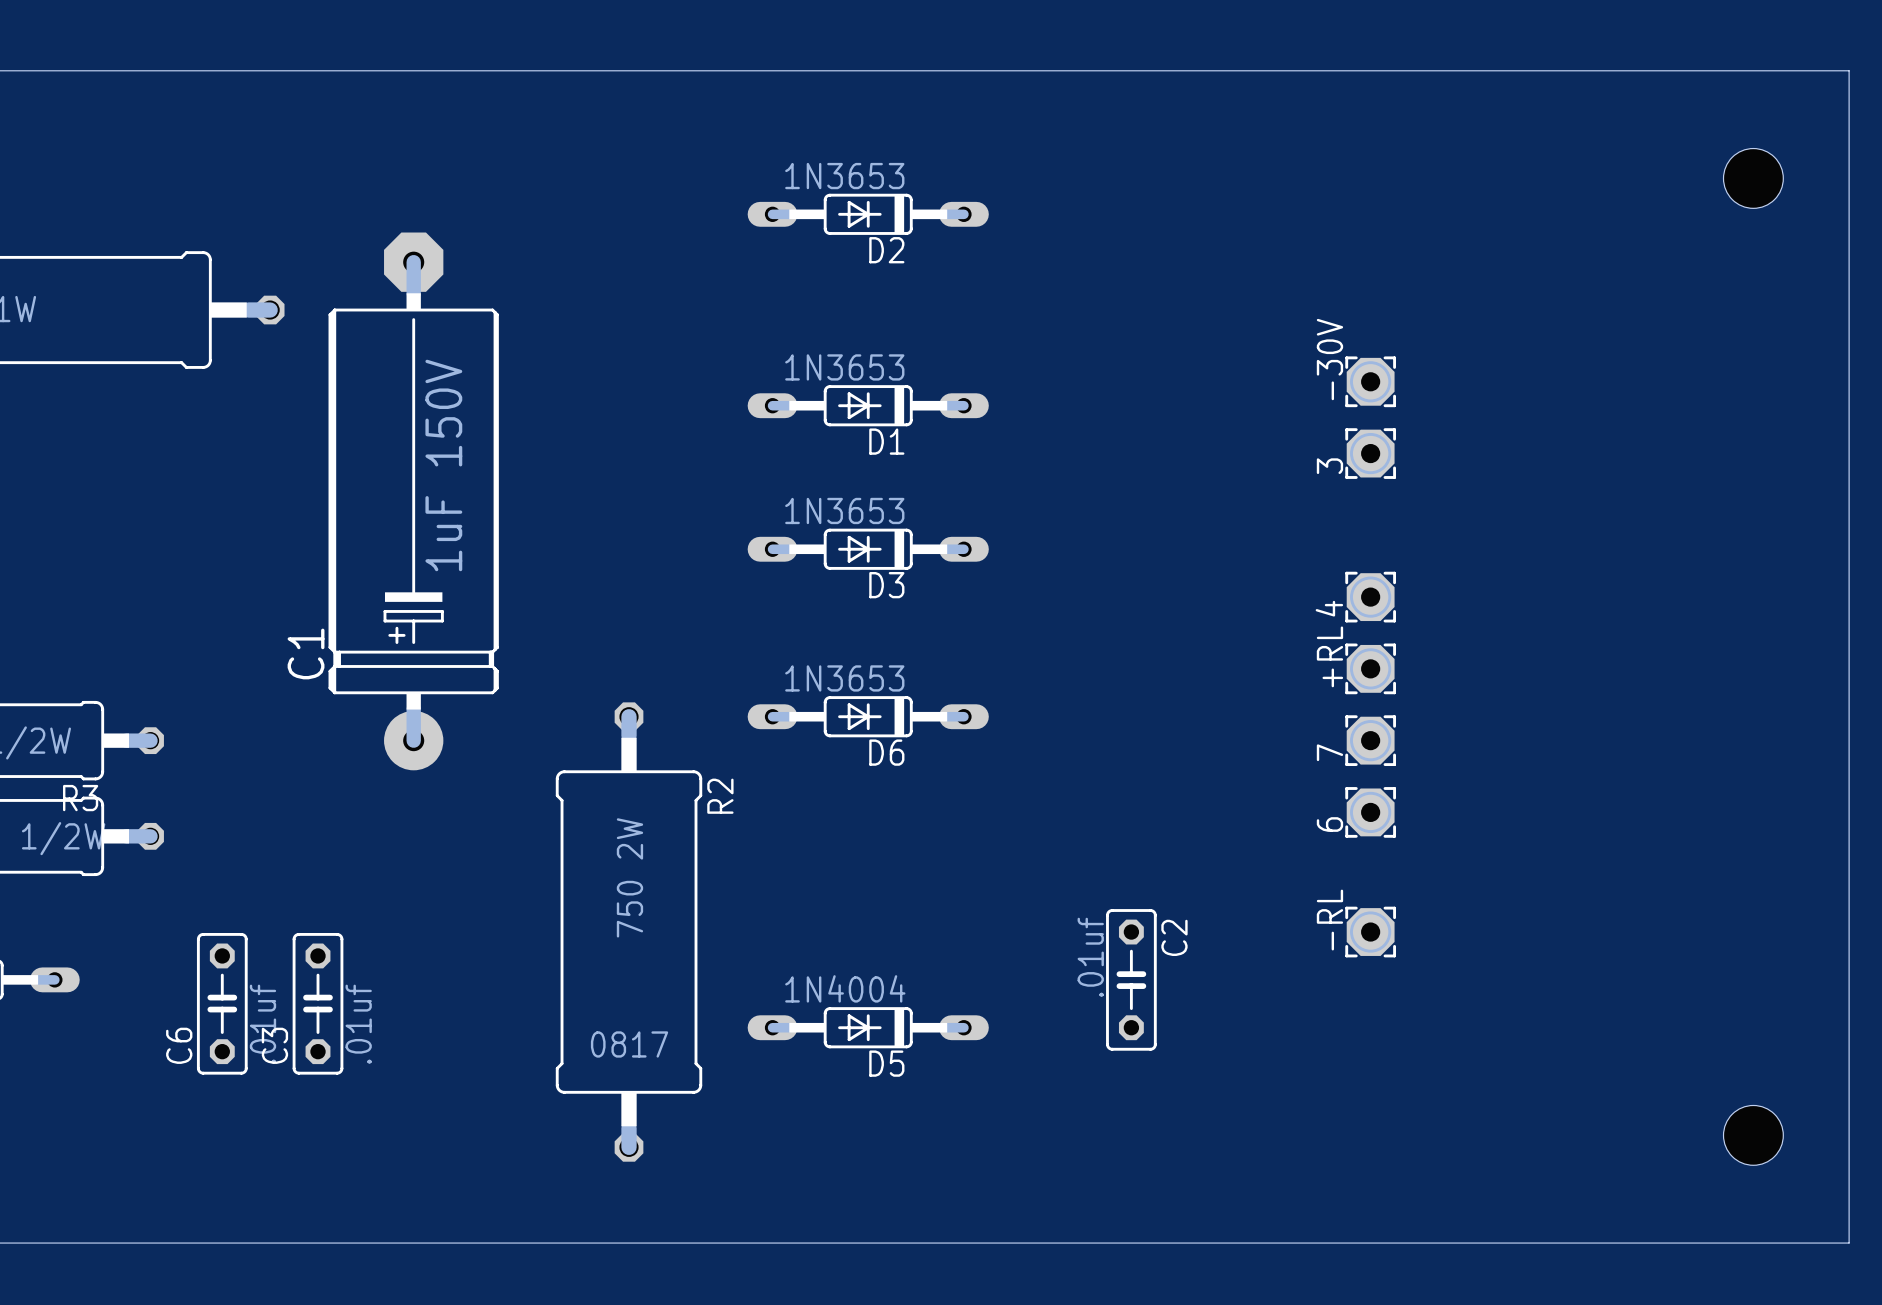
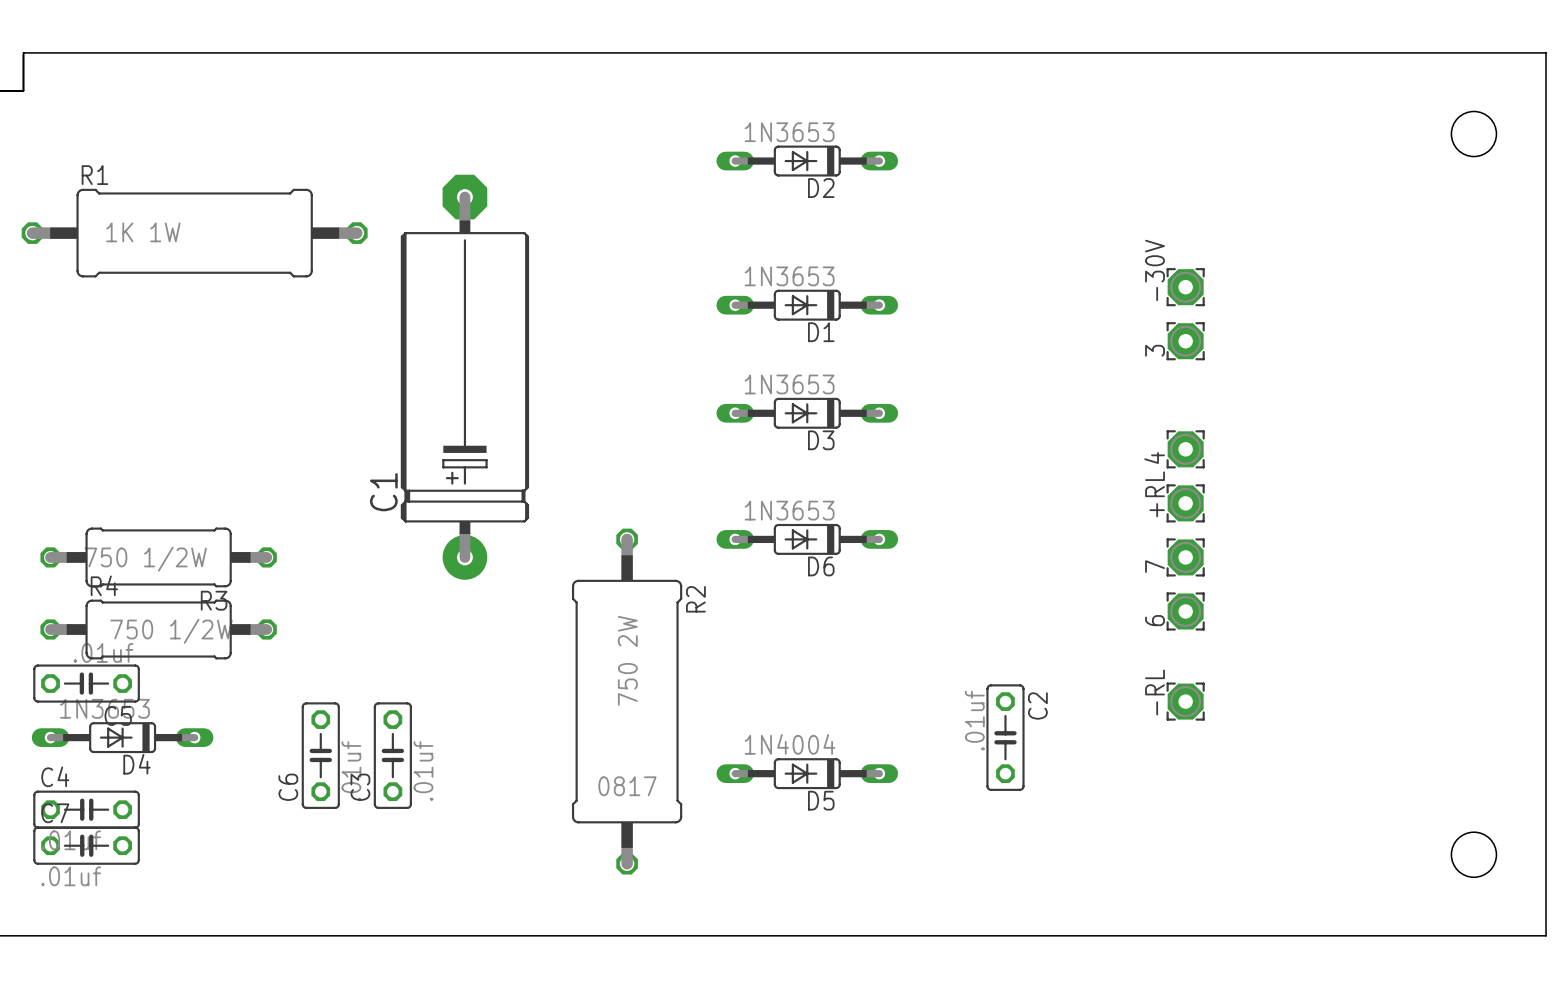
C1 value: 1uF 150V (443, 465) -> none

